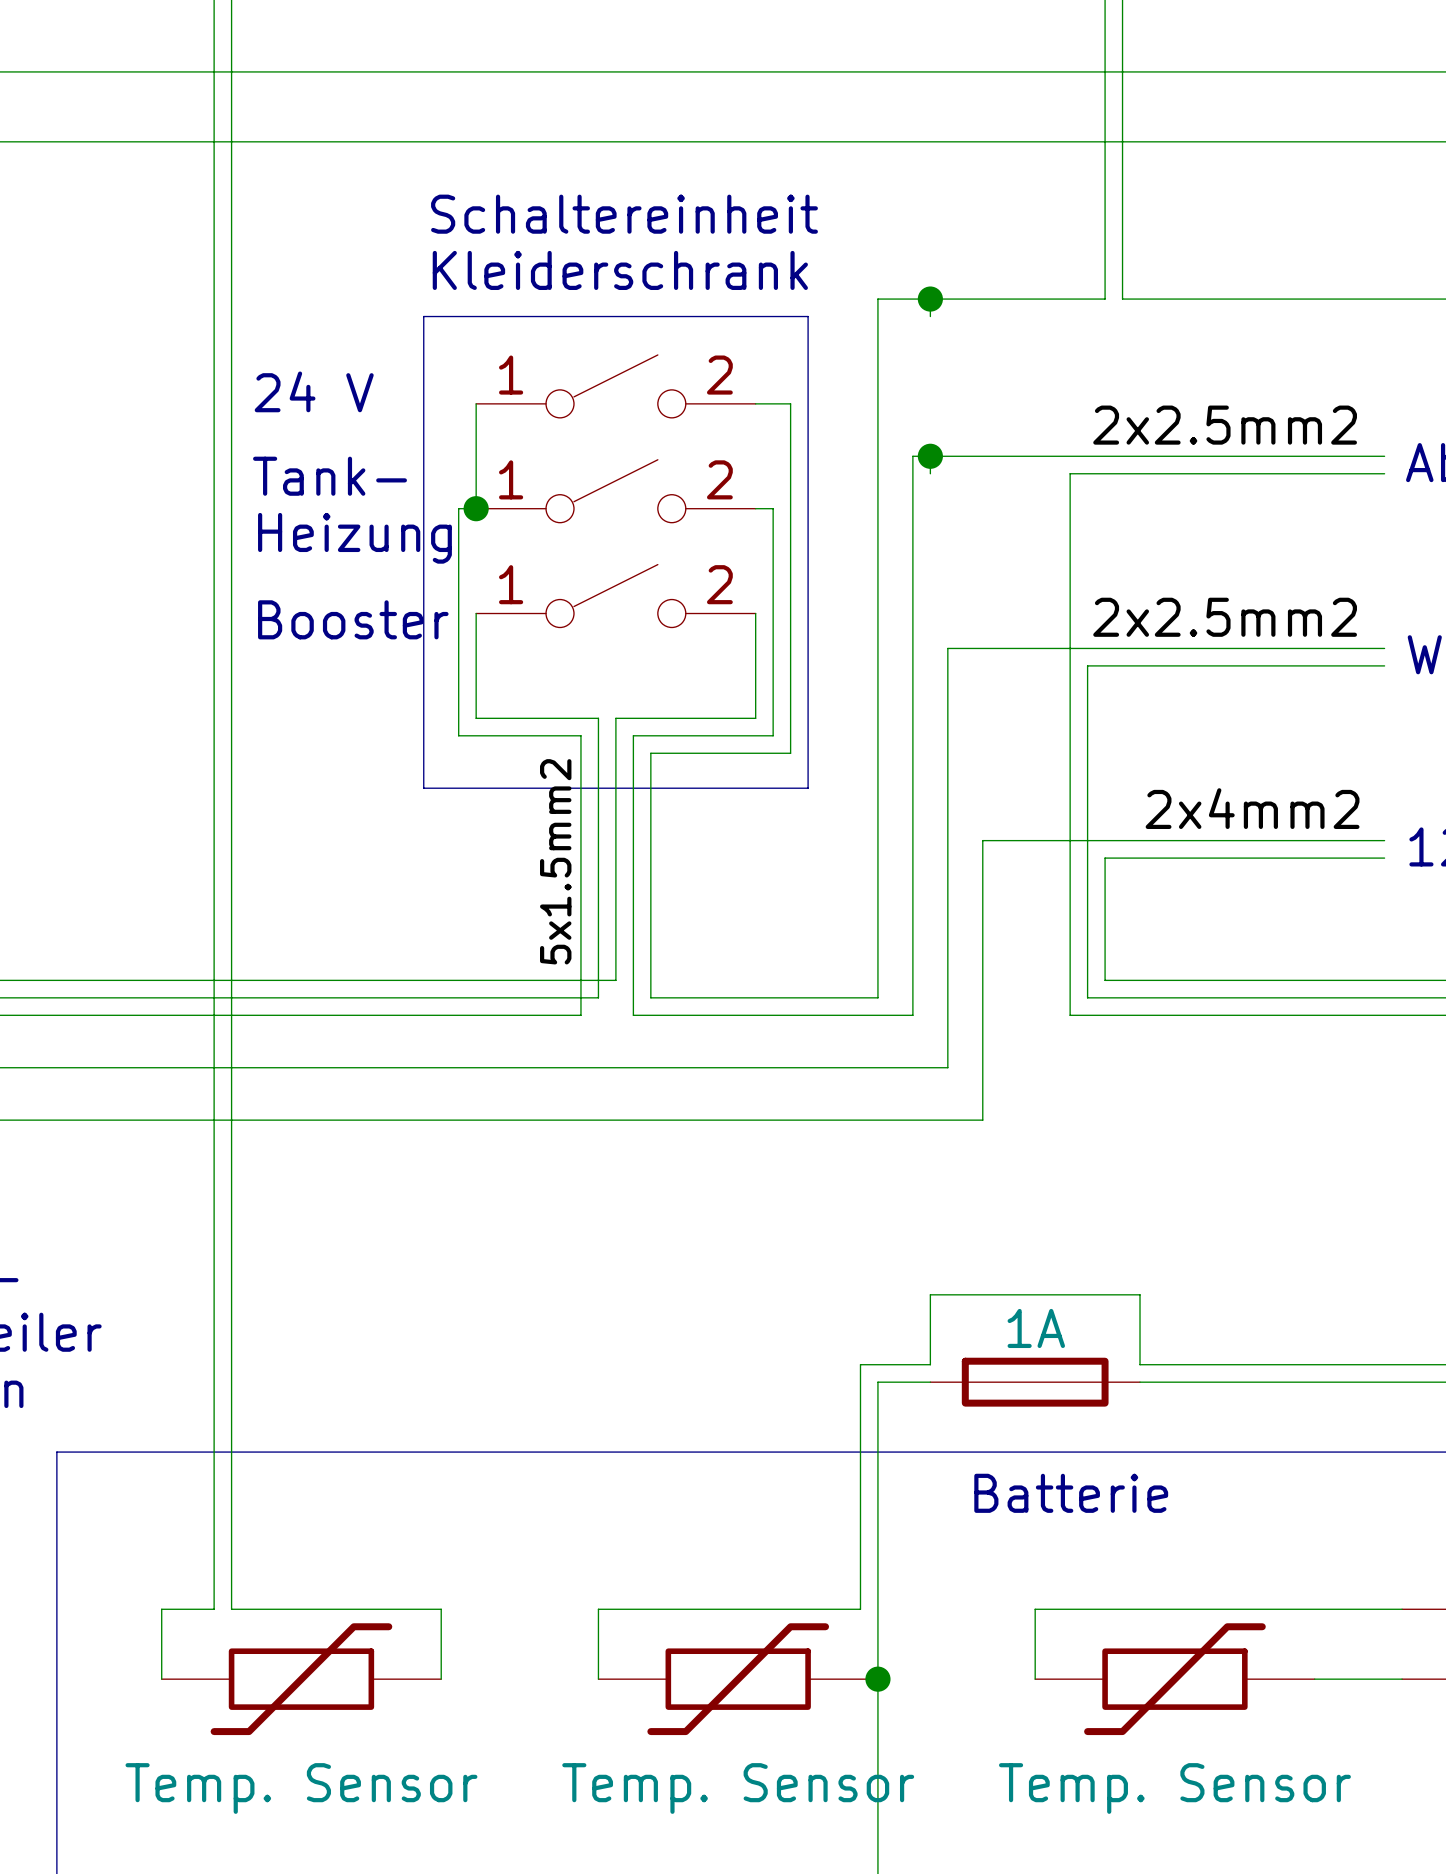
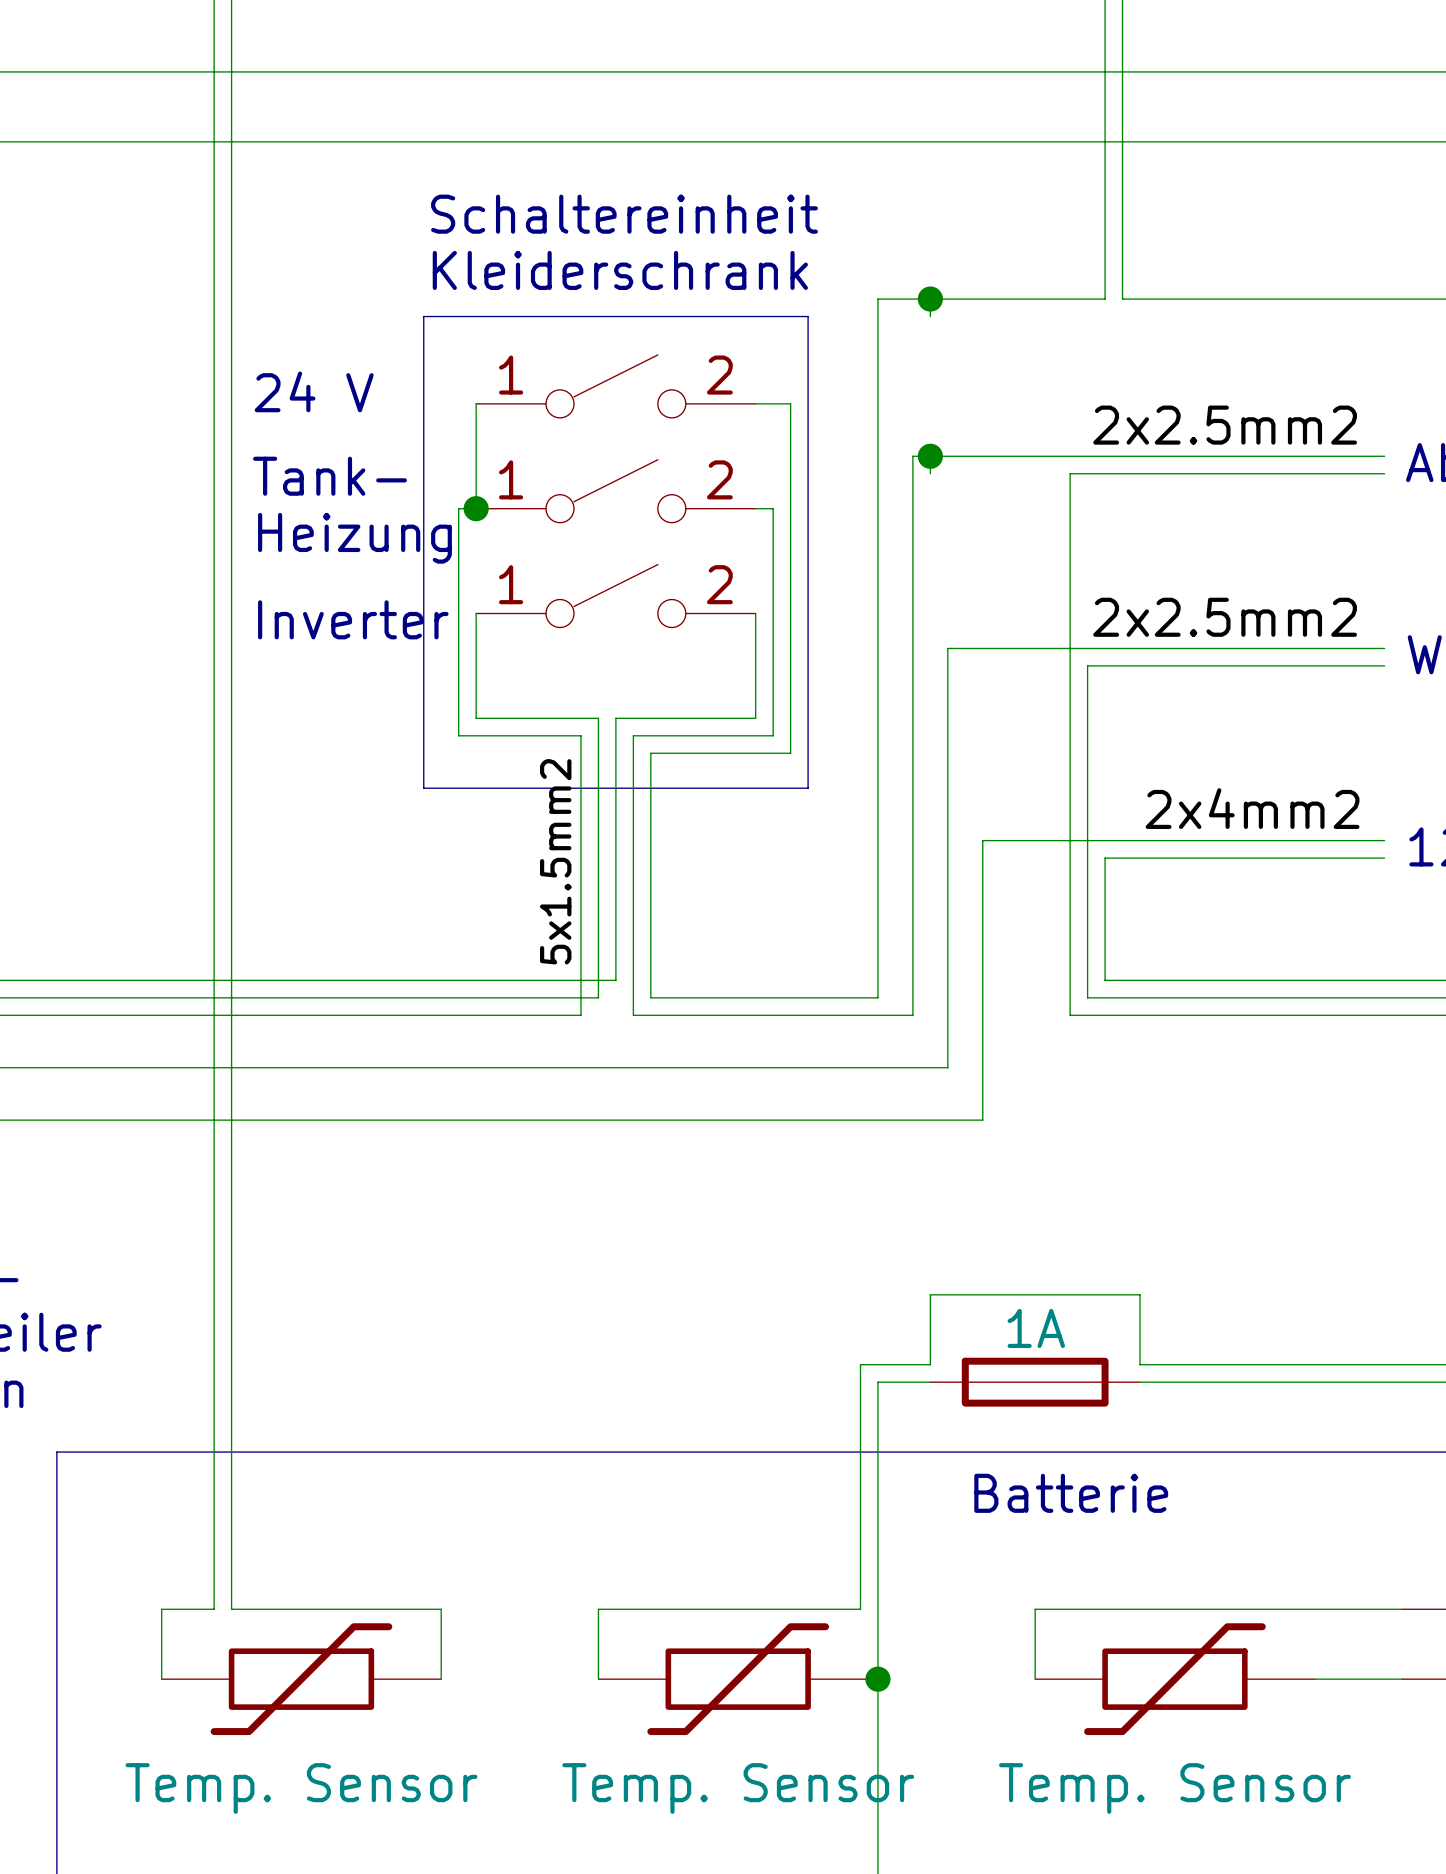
text: Booster (353, 619) -> Inverter (353, 619)

